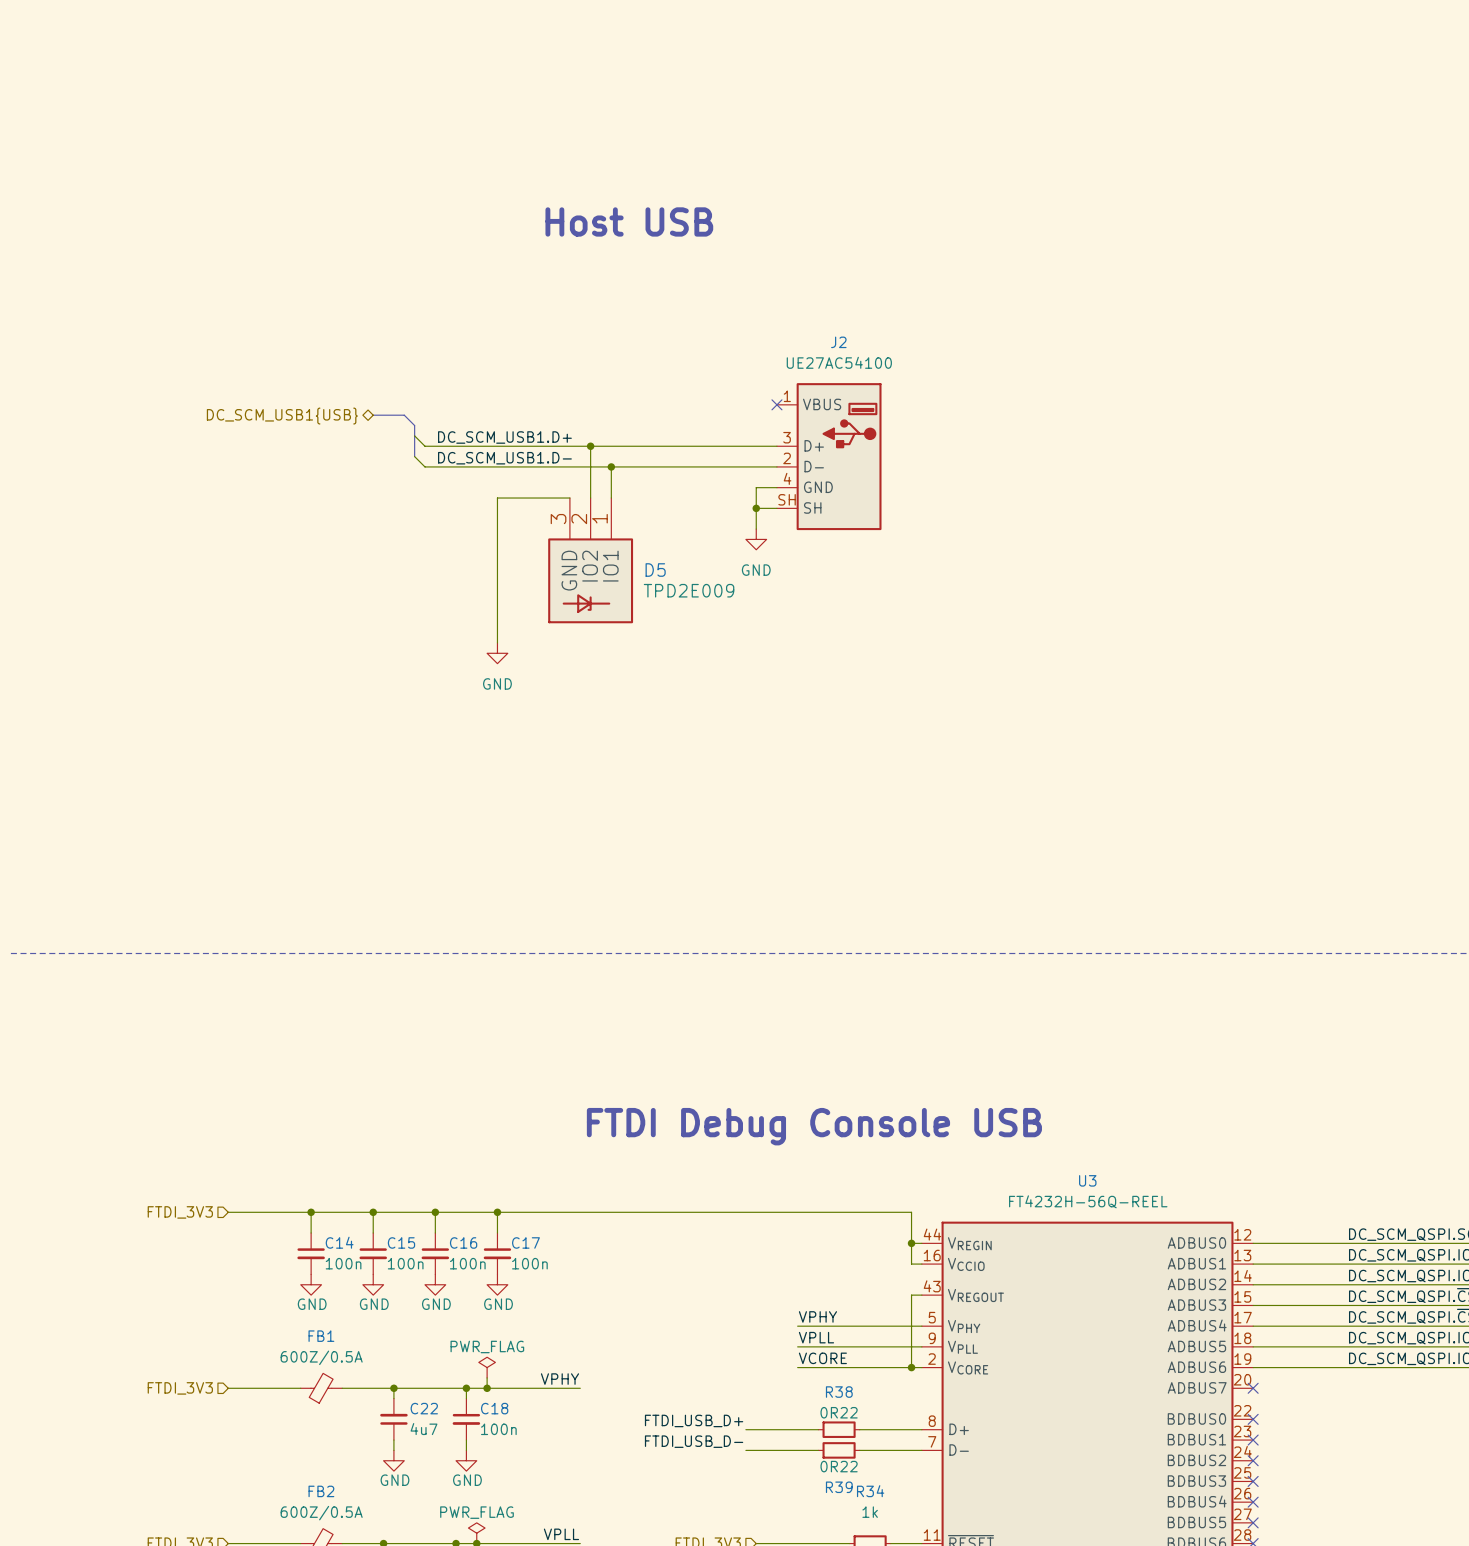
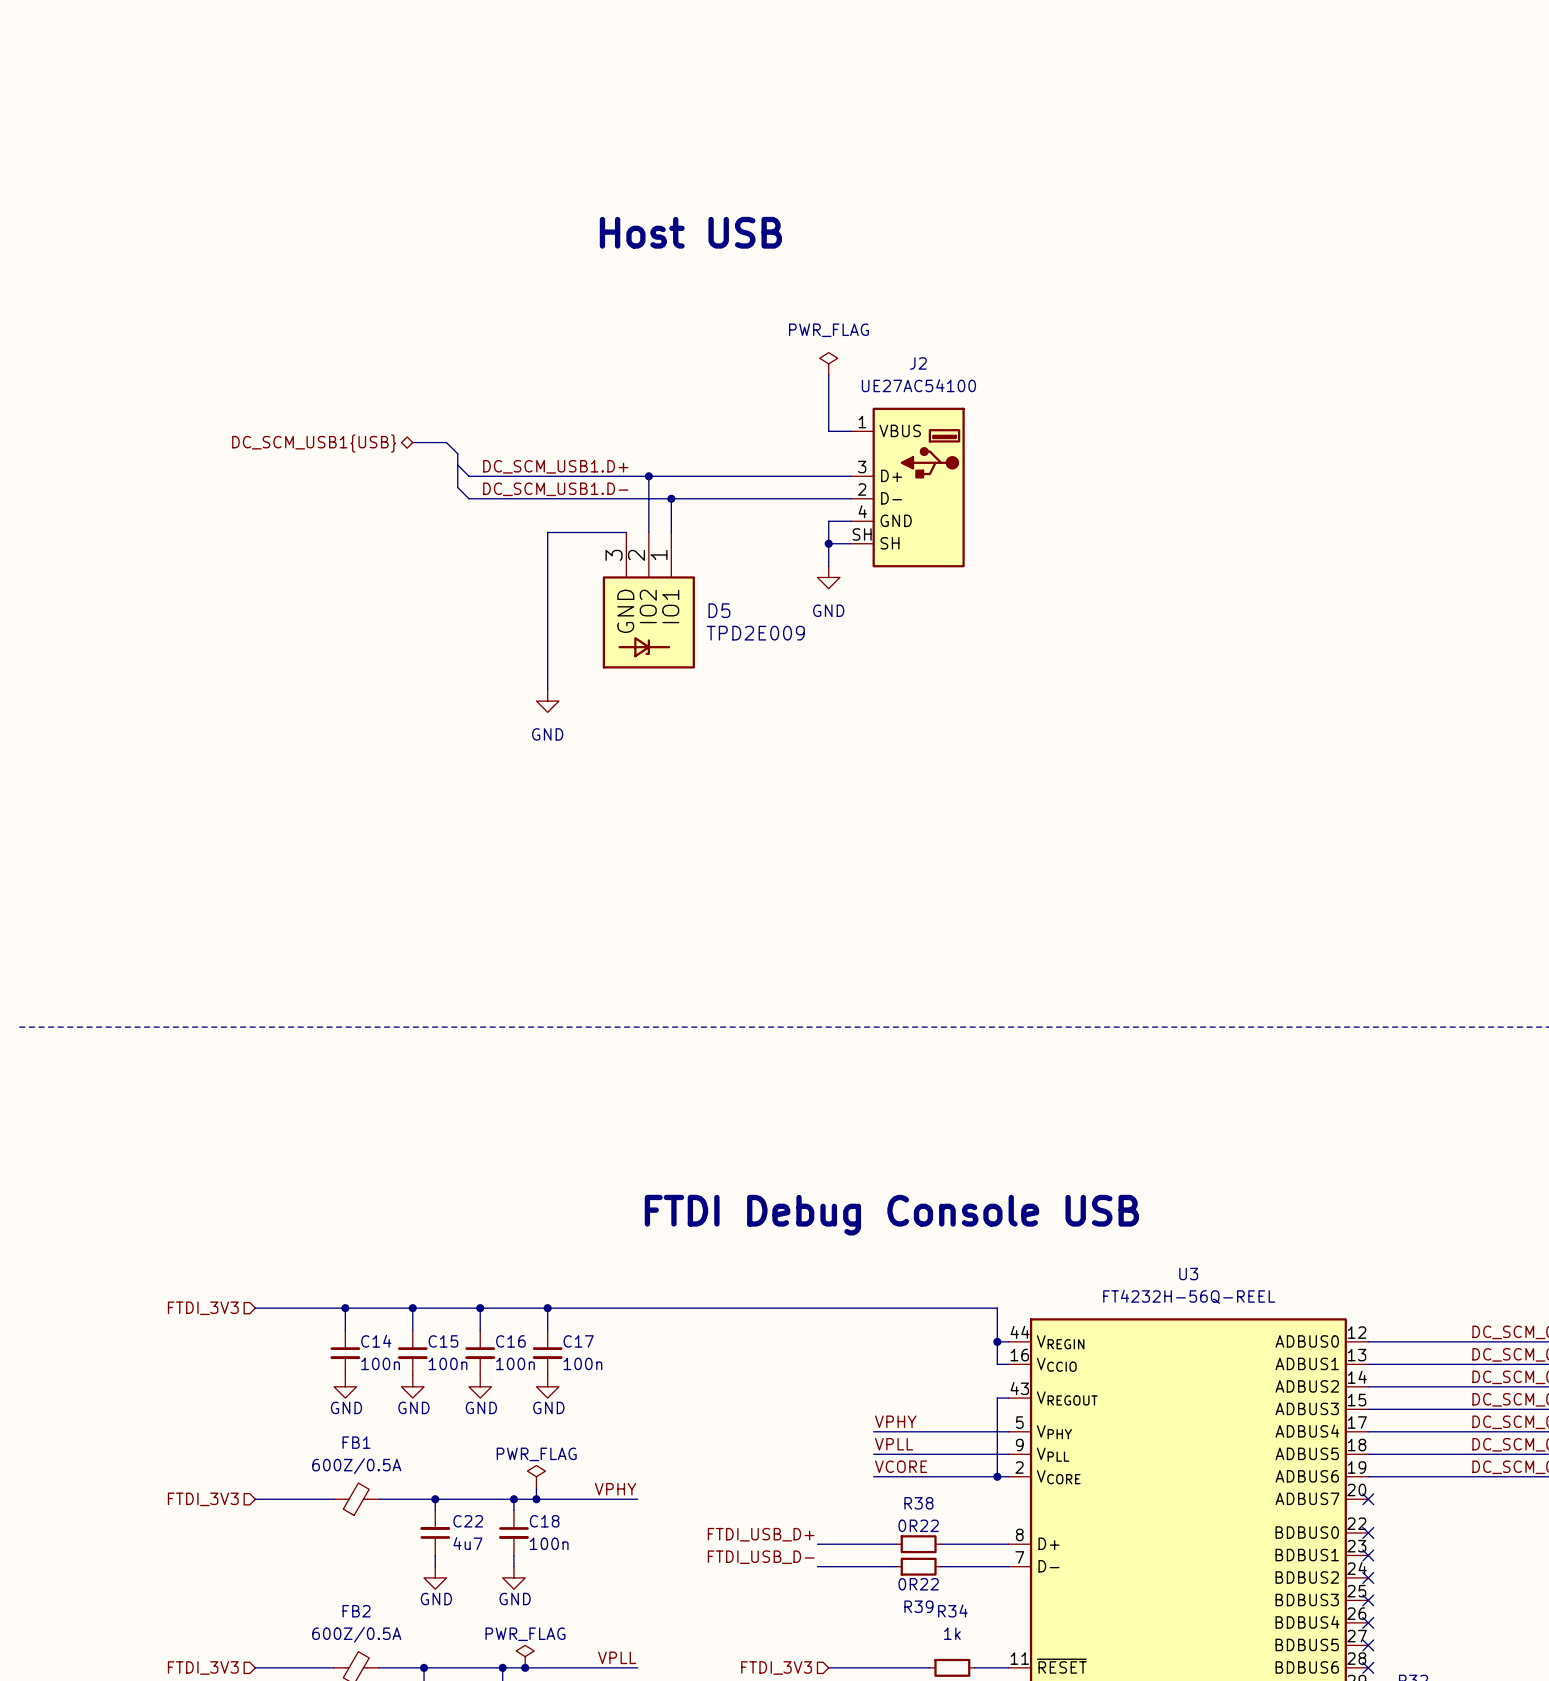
power symbol: none -> PWR_FLAG (828, 363)
wire: none -> (828, 375) (828, 431) (851, 431)
no-connect mark: (776, 404) -> none

